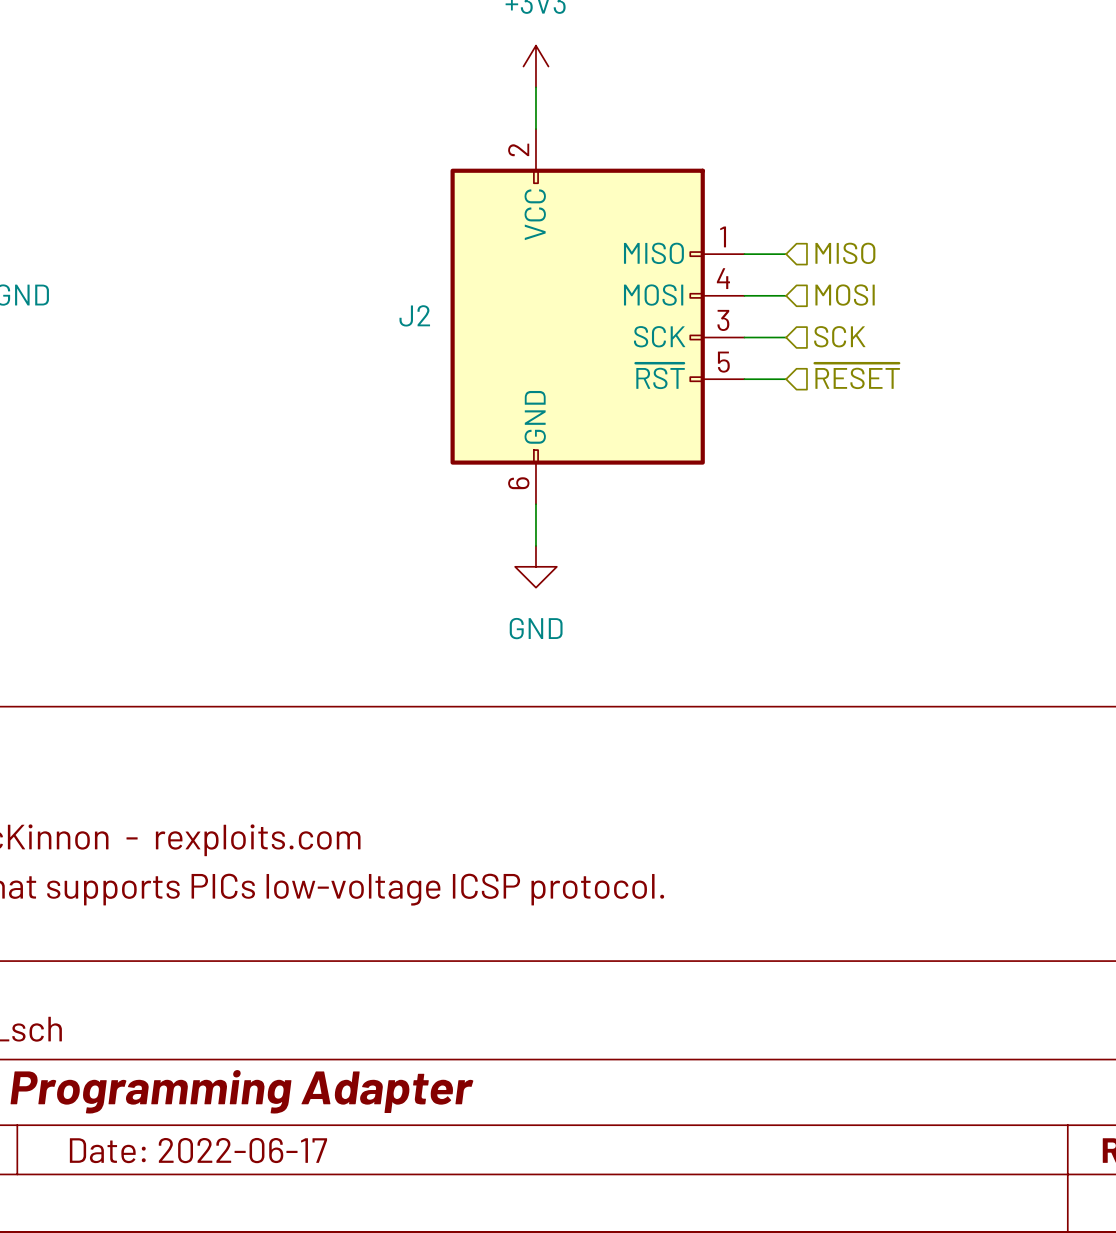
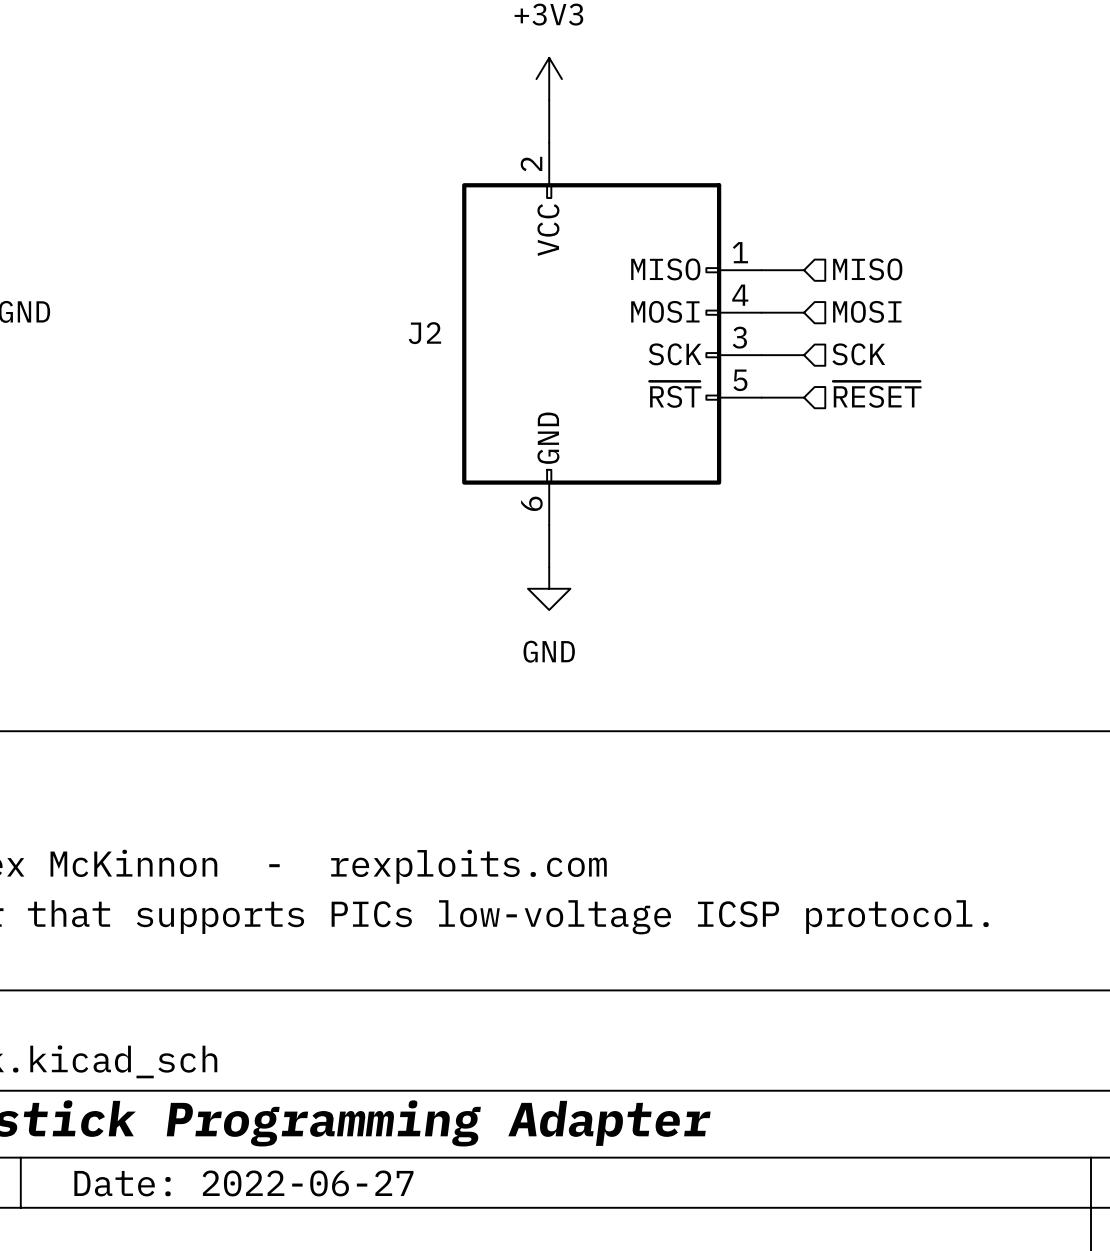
title block: Date: 2022-06-17 (198, 1150) -> Date: 2022-06-27 (243, 1183)

